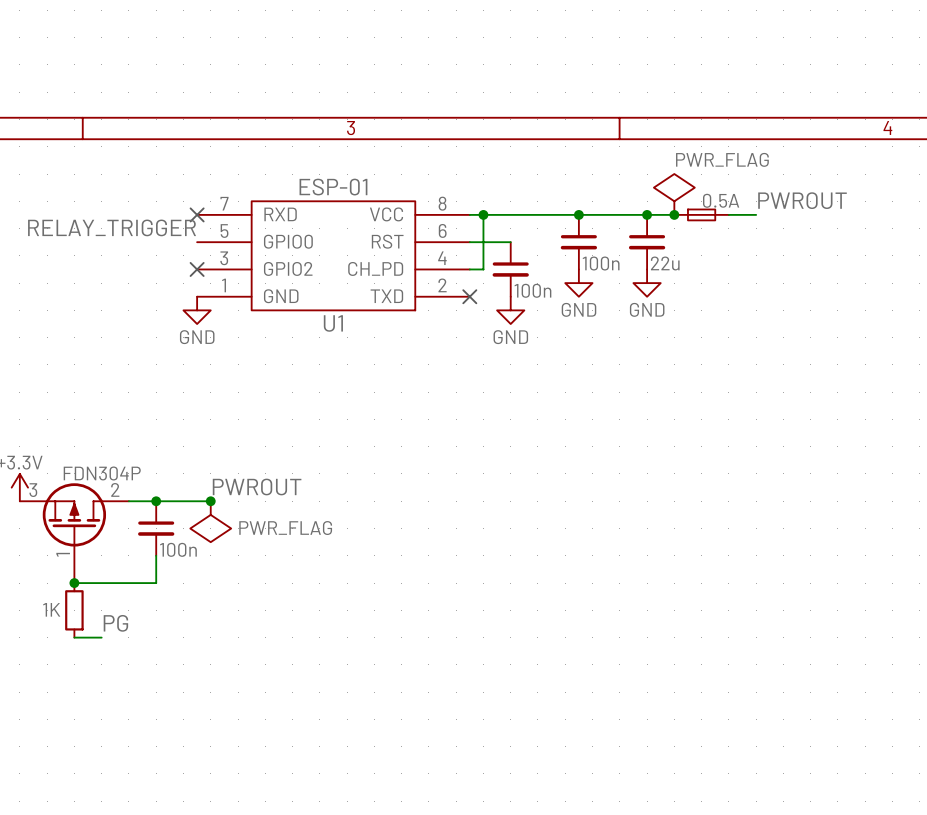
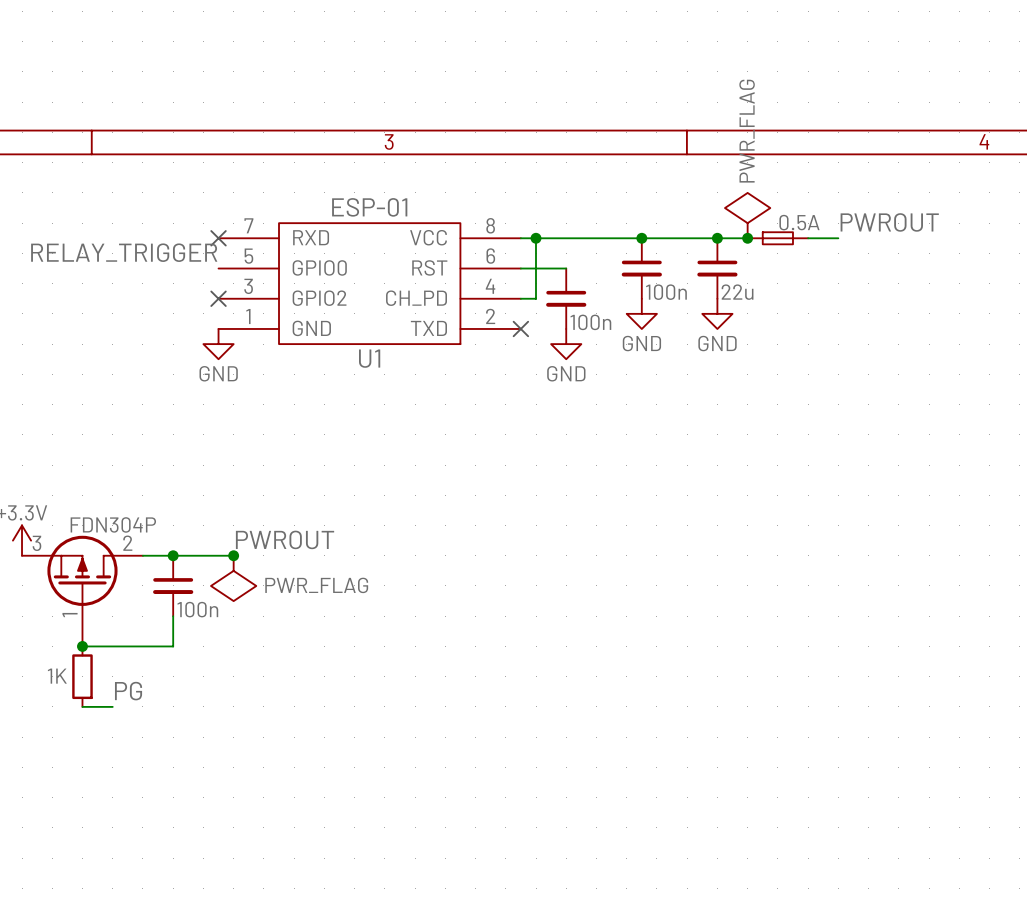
power symbol text rotation: 0° (722, 159) -> 90° counterclockwise (747, 131)

